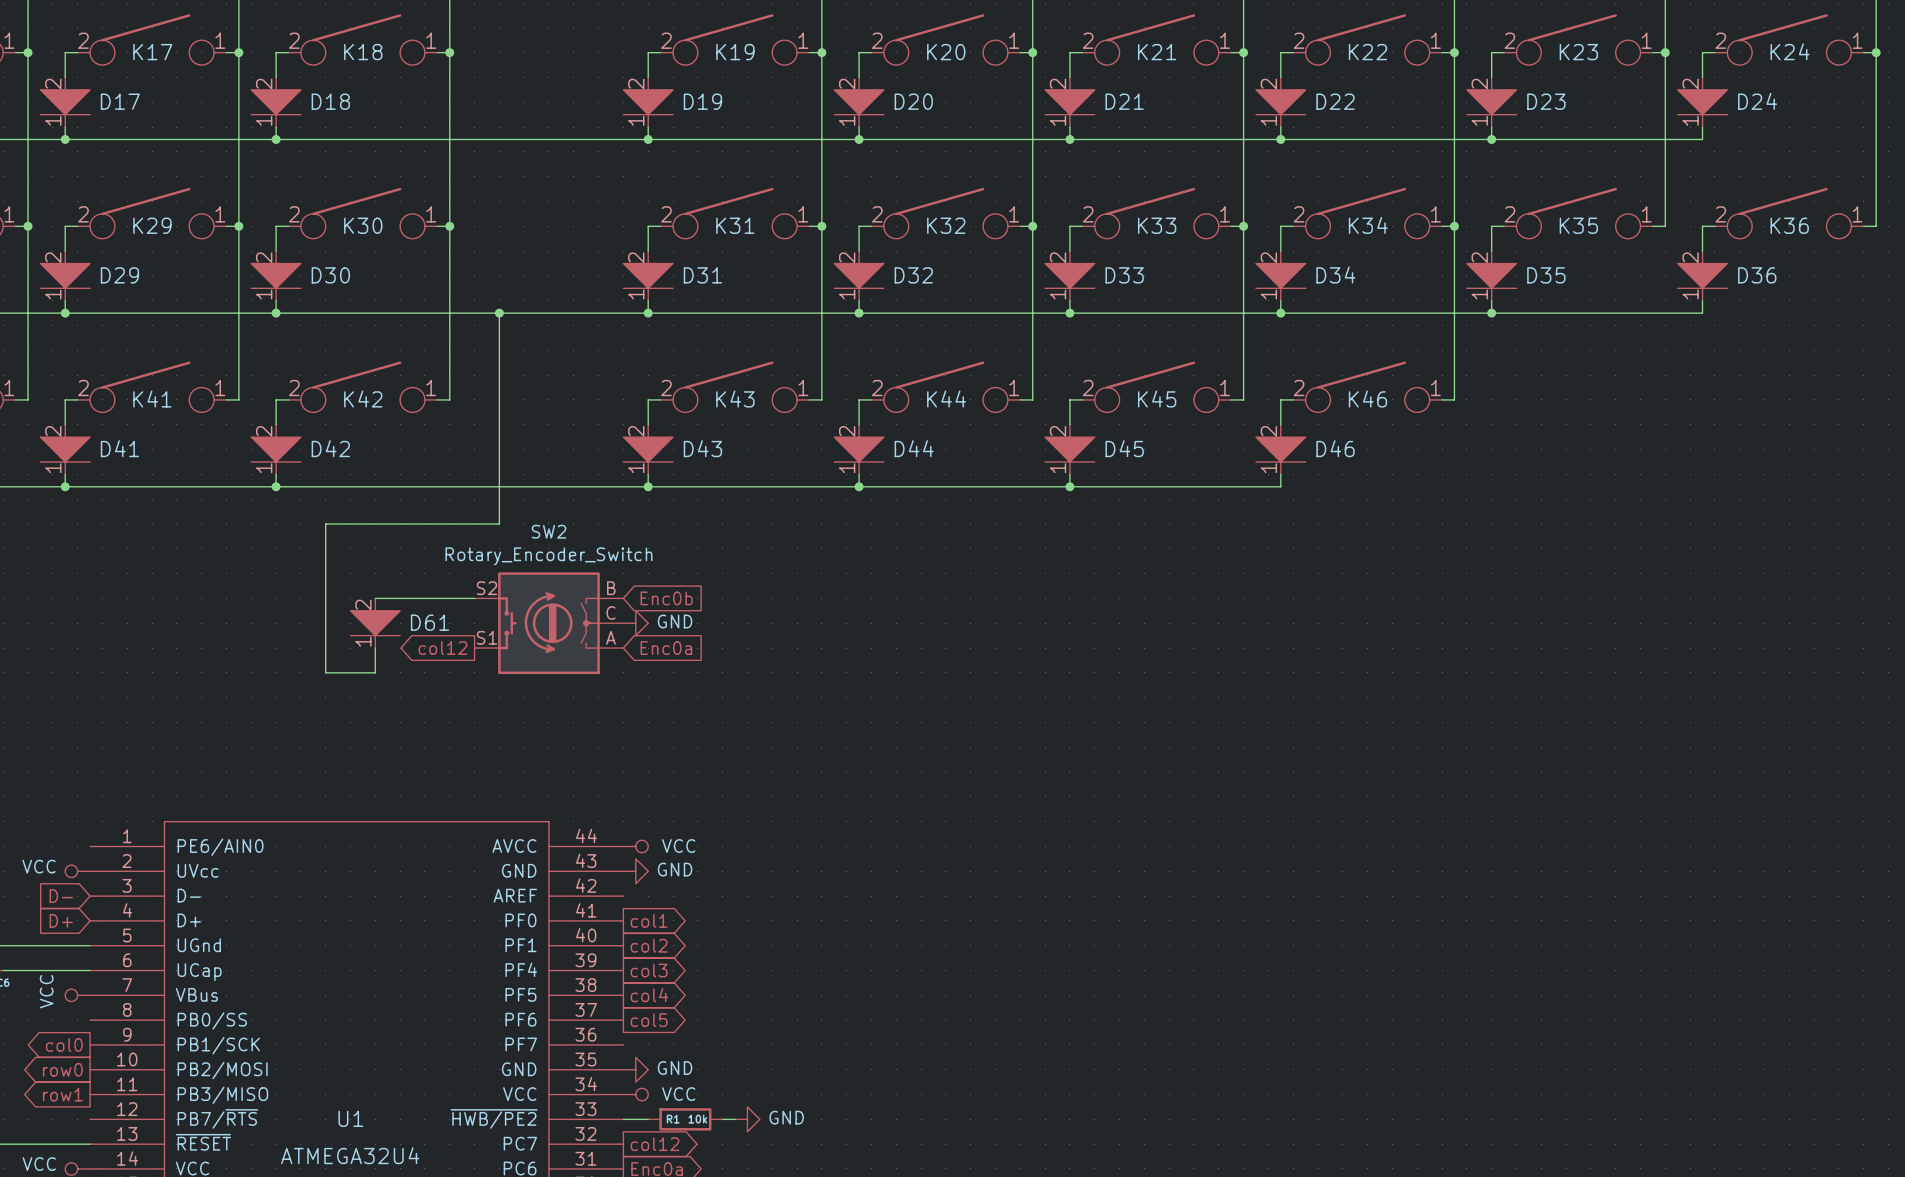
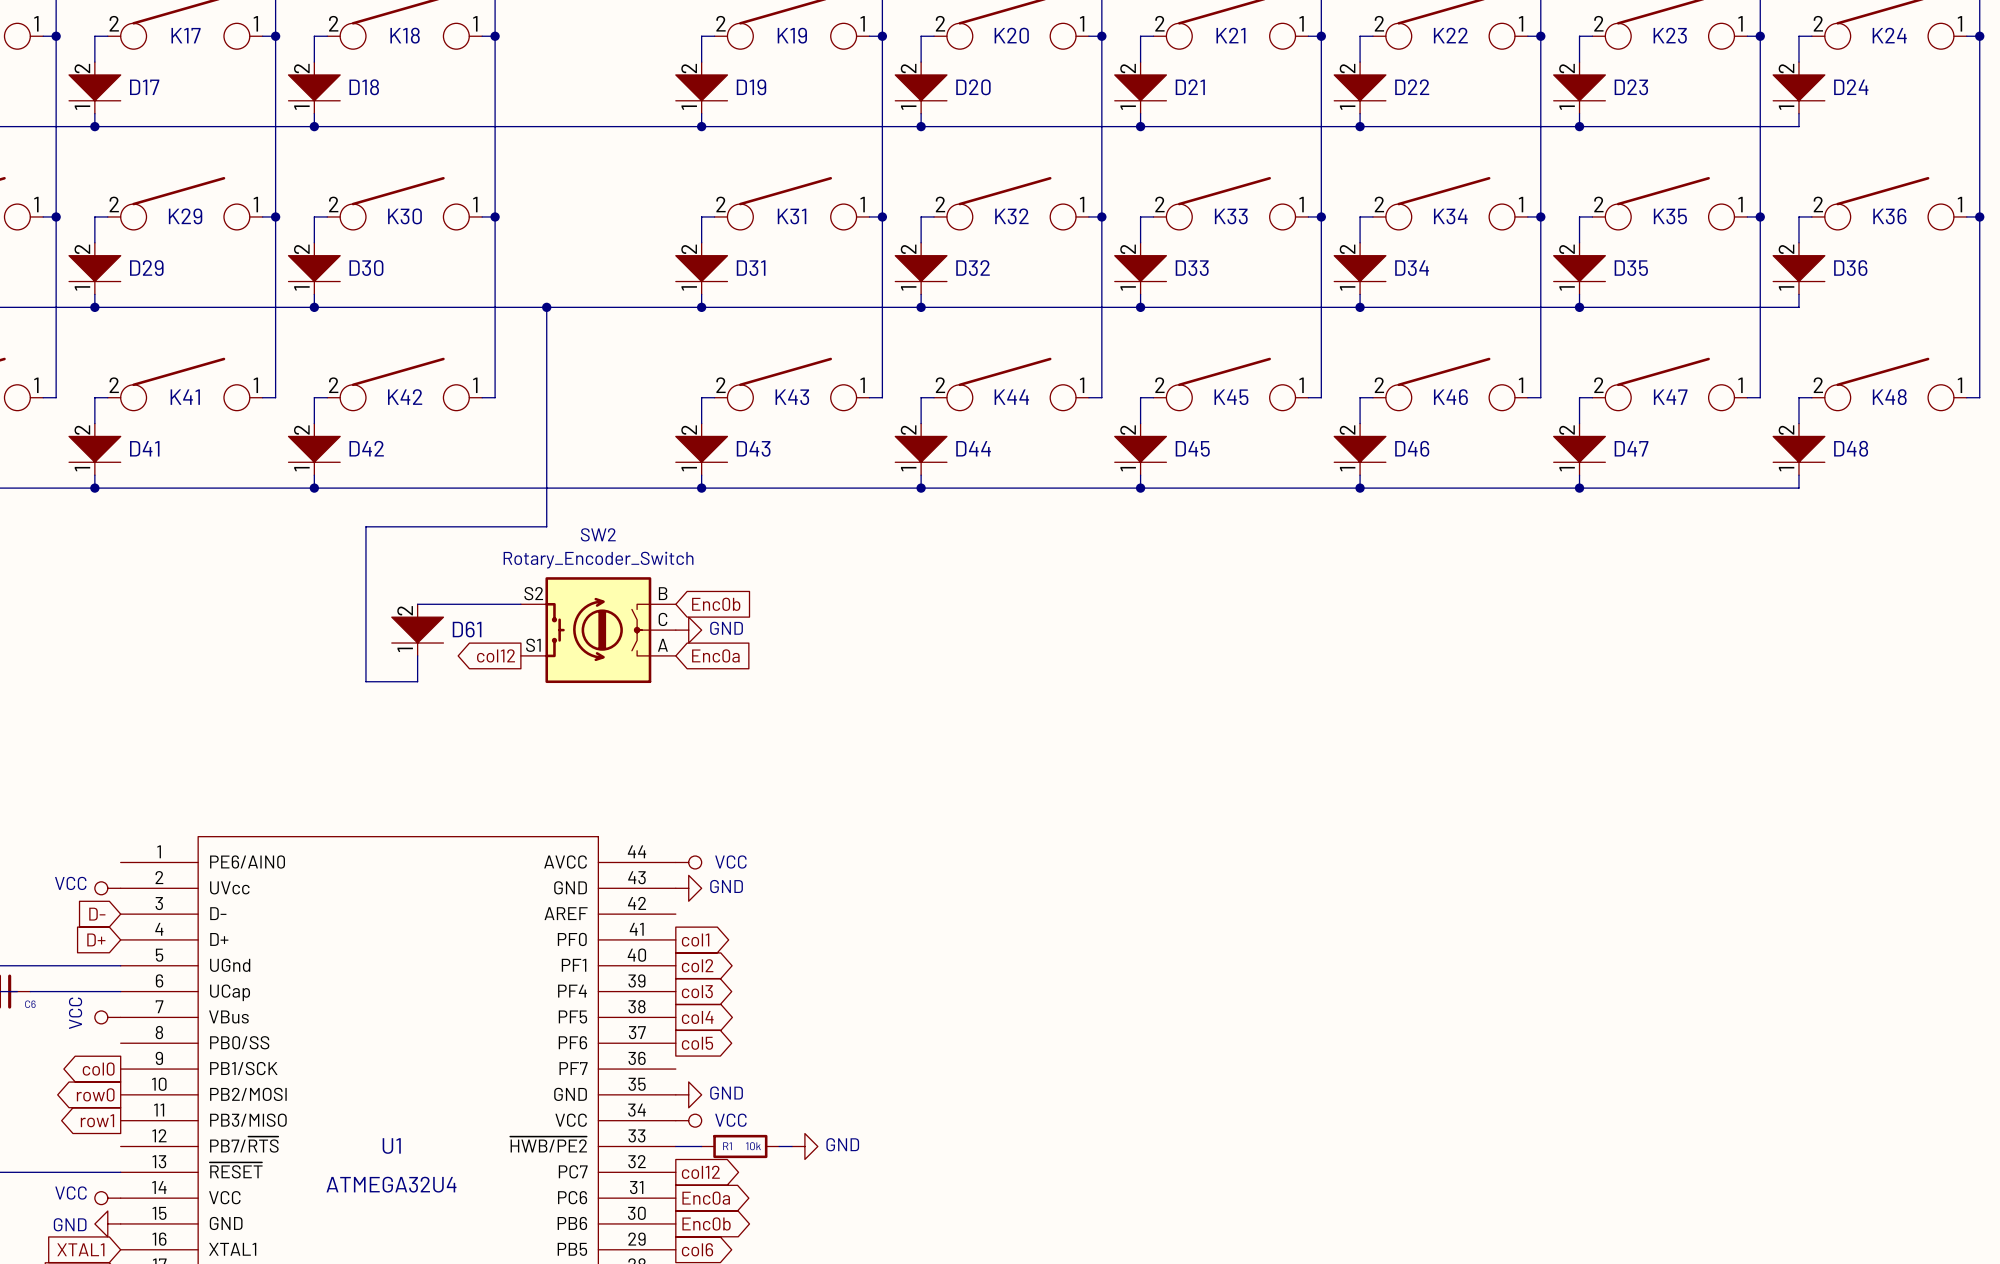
wire: none -> (1760, 216) (1760, 397) (1747, 397)
junction: none -> (1760, 216)
wire: none -> (1979, 216) (1979, 397) (1966, 397)
junction: none -> (1979, 216)
K47: none -> (1669, 384)
K48: none -> (1889, 384)
wire: none -> (1592, 397) (1579, 397) (1579, 423)
wire: none -> (1811, 397) (1798, 397) (1798, 423)
D47: none -> (1579, 449)
D48: none -> (1798, 449)
wire: none -> (1579, 475) (1579, 488)
wire: none -> (1798, 475) (1798, 488) (1360, 488)
junction: none -> (1360, 488)
junction: none -> (1579, 488)

